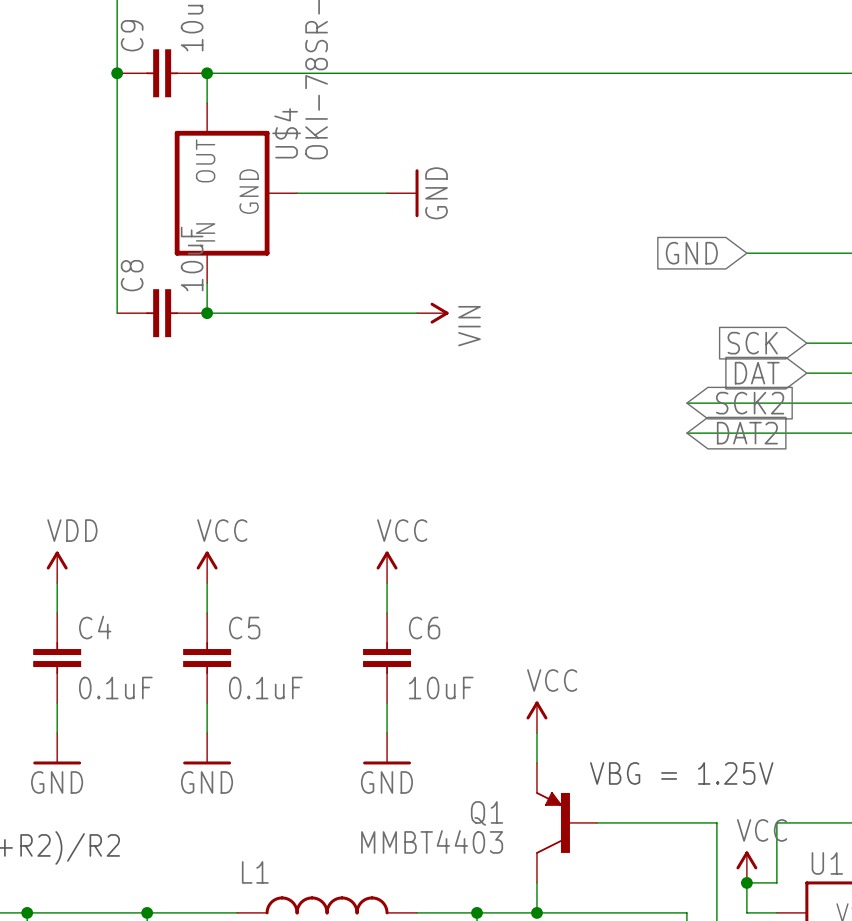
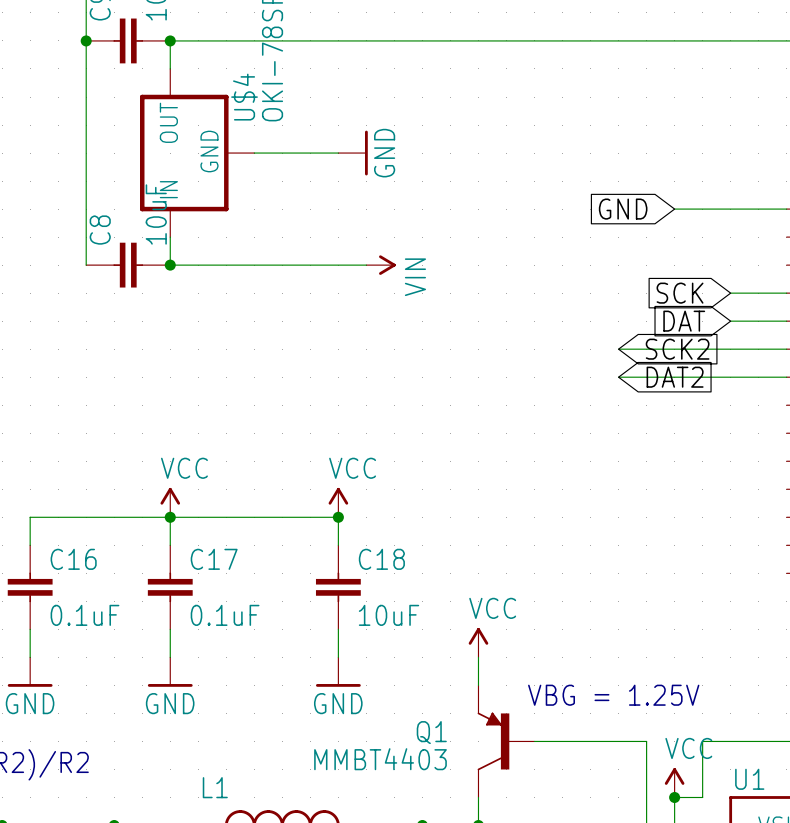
power symbol: VDD (57, 567) -> none
wire: none -> (30, 517) (338, 517)
junction: none -> (170, 517)
junction: none -> (338, 517)
C4 name: C4 (95, 627) -> C16 (73, 559)
C5 name: C5 (244, 628) -> C17 (214, 559)
C6 name: C6 (424, 628) -> C18 (381, 559)

